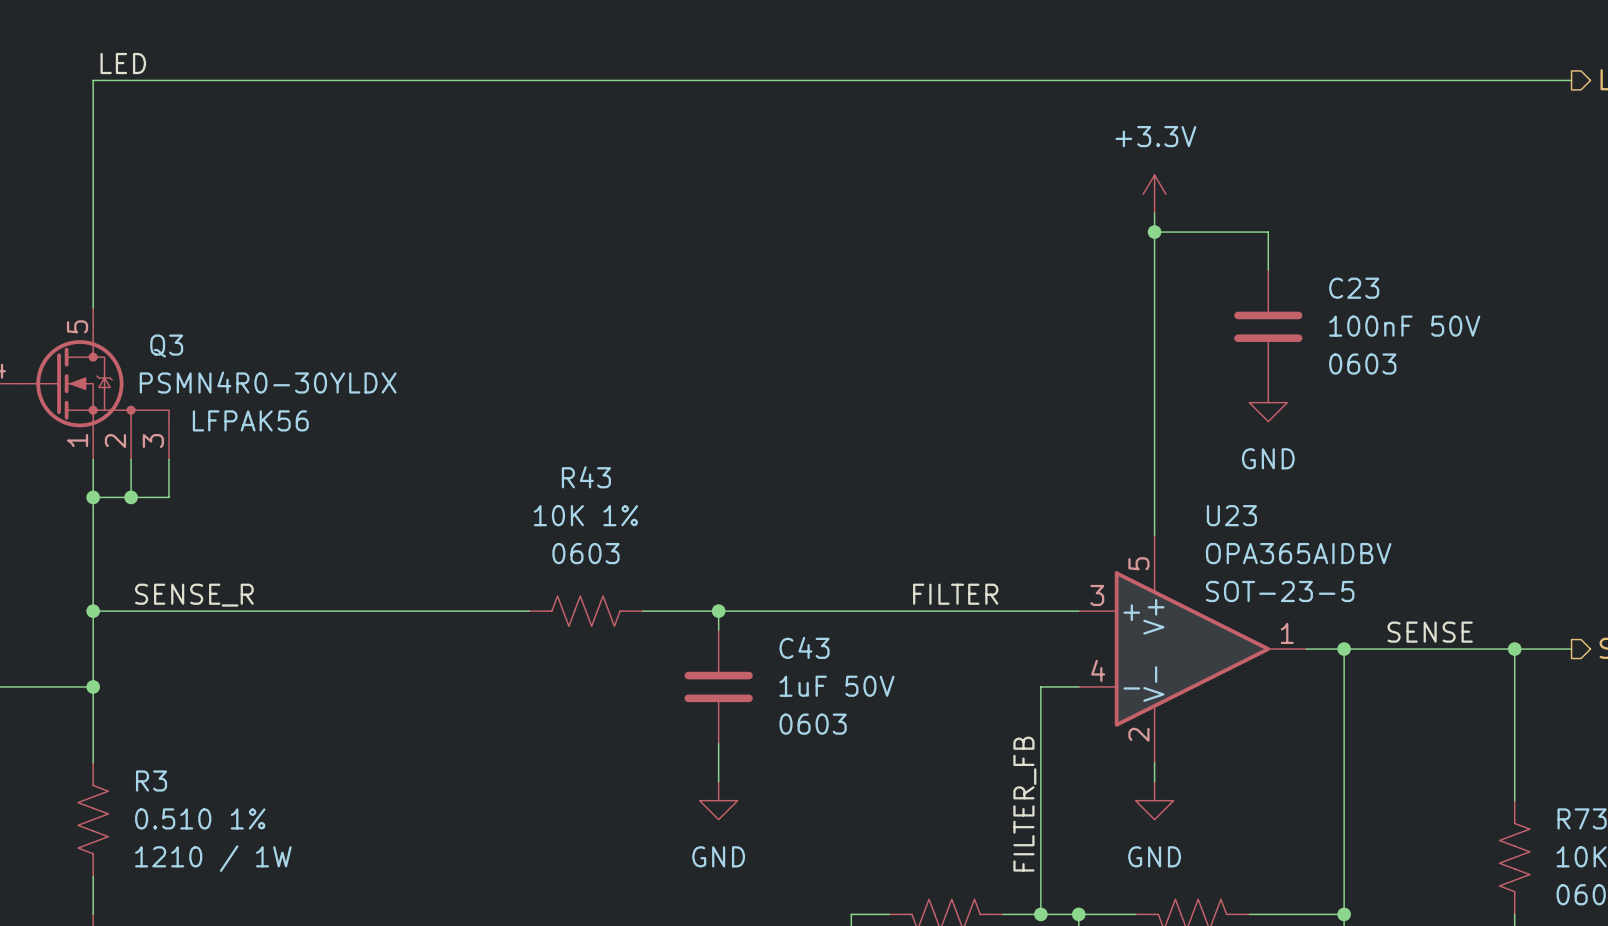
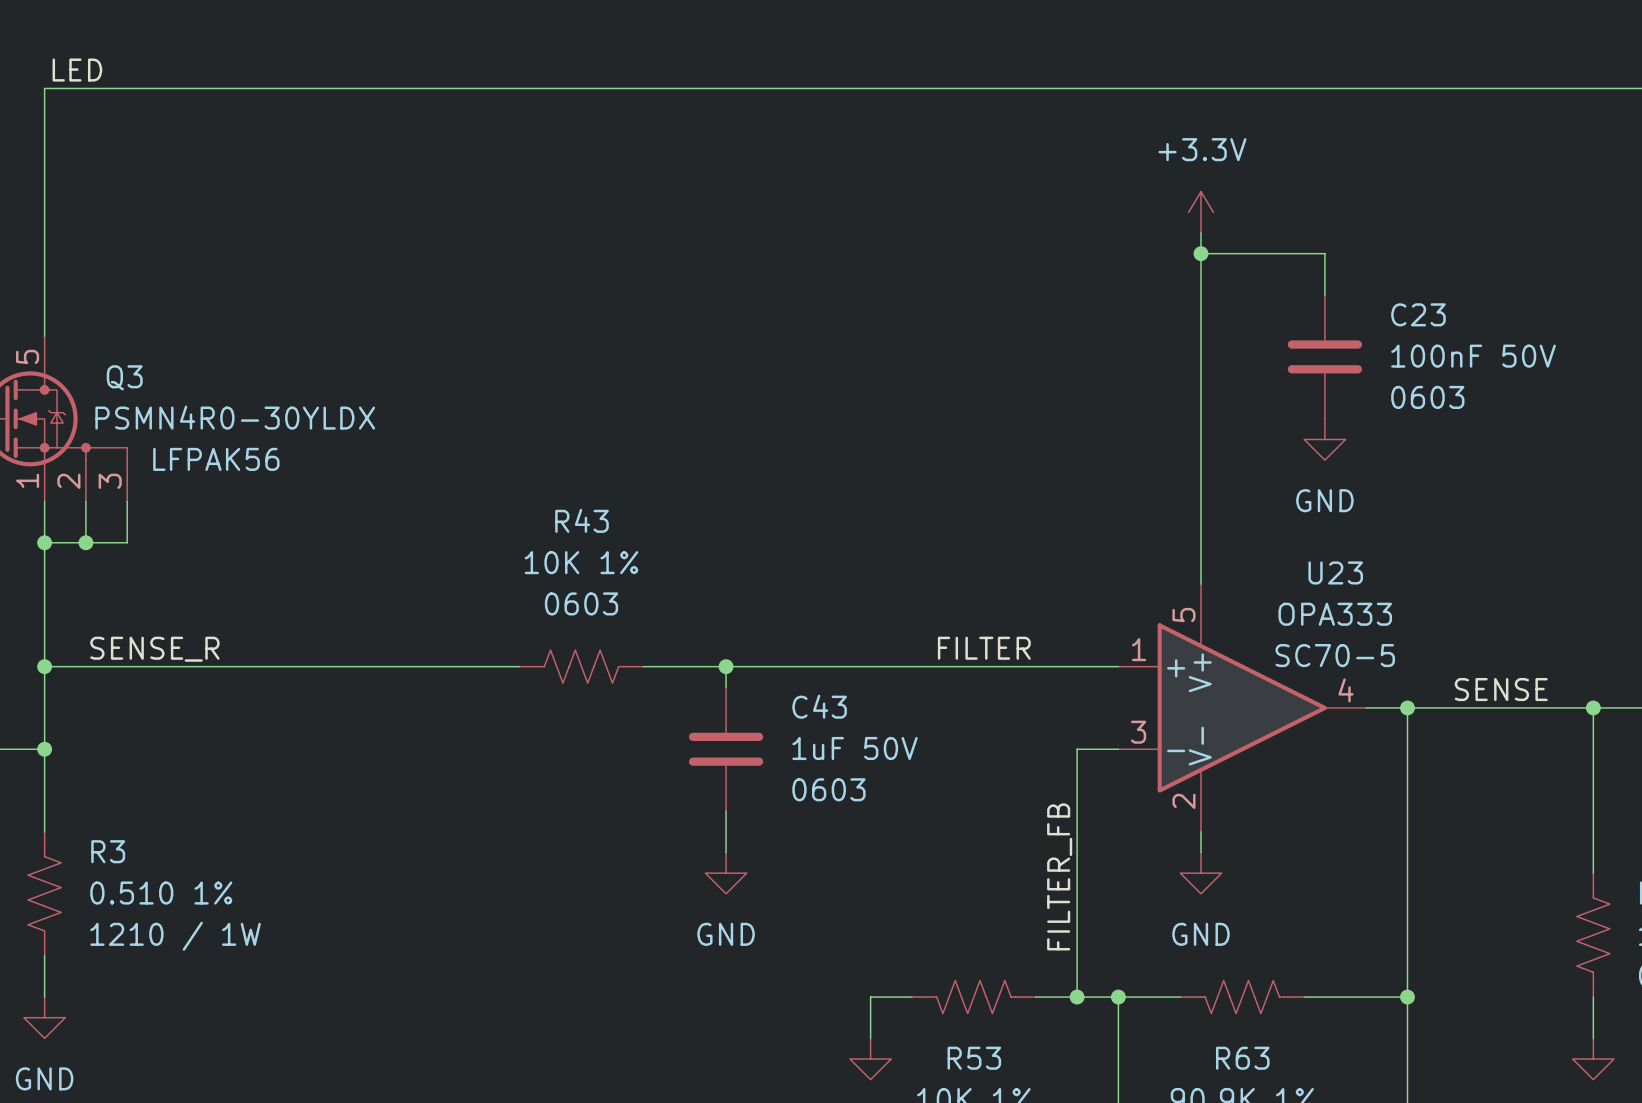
U23 name position: U23 (1231, 515) -> U23 (1335, 572)
U23 value: OPA365AIDBV (1298, 553) -> OPA333 (1335, 614)
U23 text: SOT-23-5 (1280, 591) -> SC70-5 (1335, 655)
U23 pin number: 3 (1097, 595) -> 1 (1139, 649)
U23 pin number: 1 (1287, 633) -> 4 (1346, 690)
U23 pin number: 4 (1098, 670) -> 3 (1138, 732)

